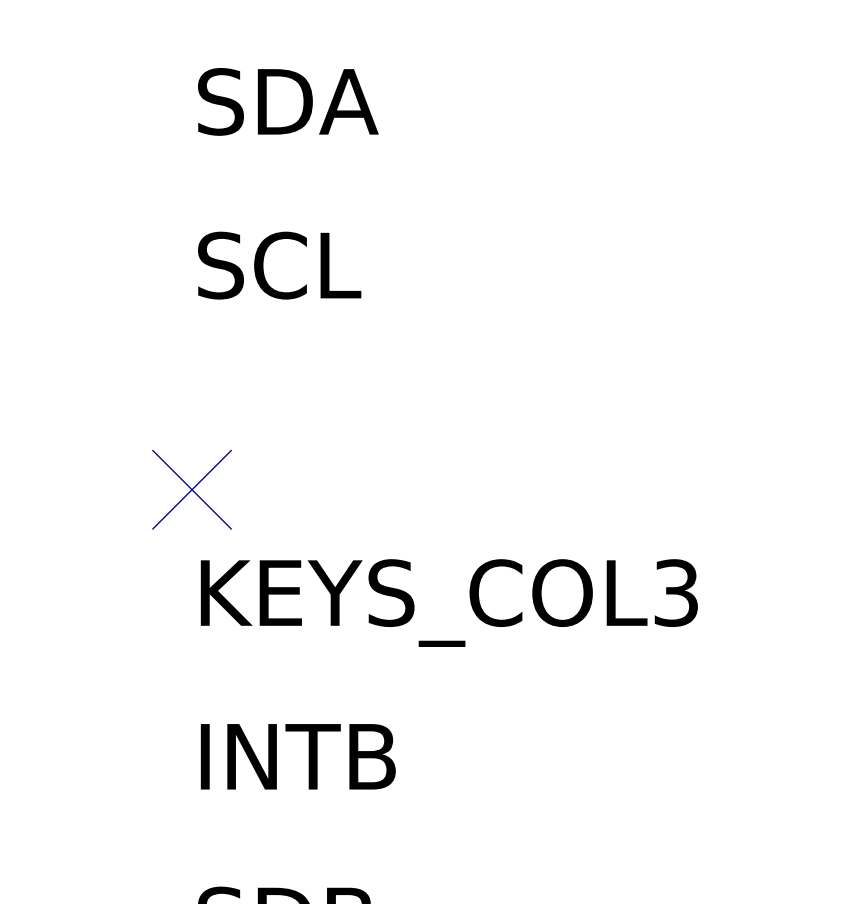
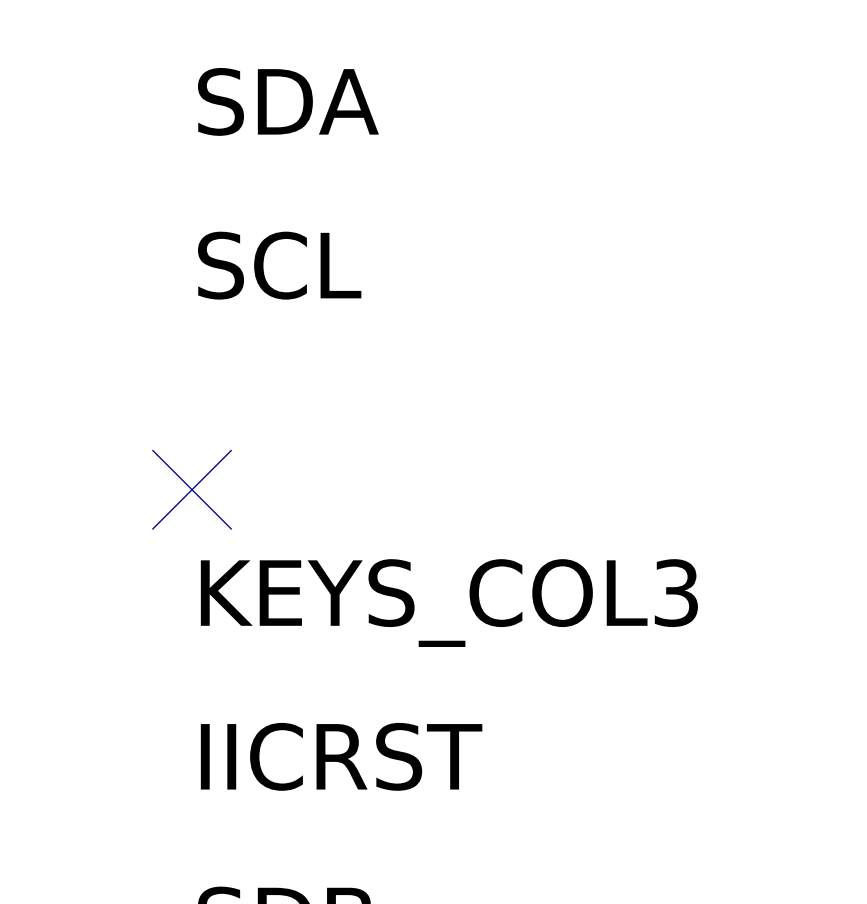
label: INTB (298, 756) -> IICRST (341, 756)

